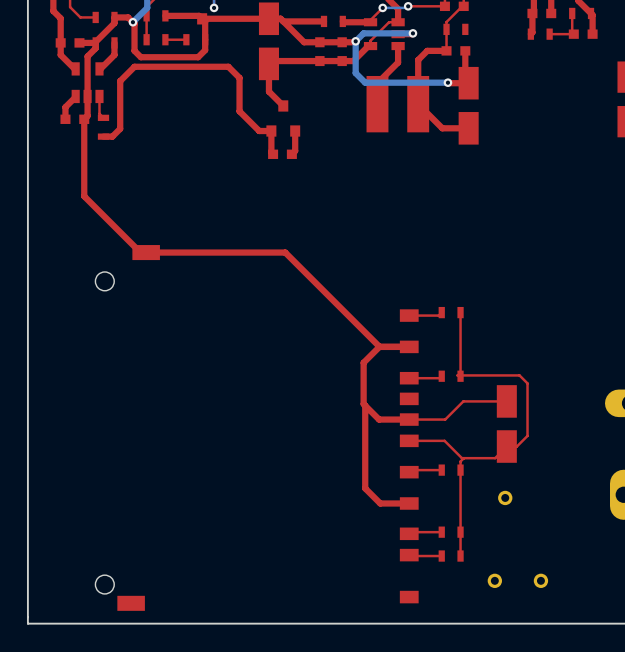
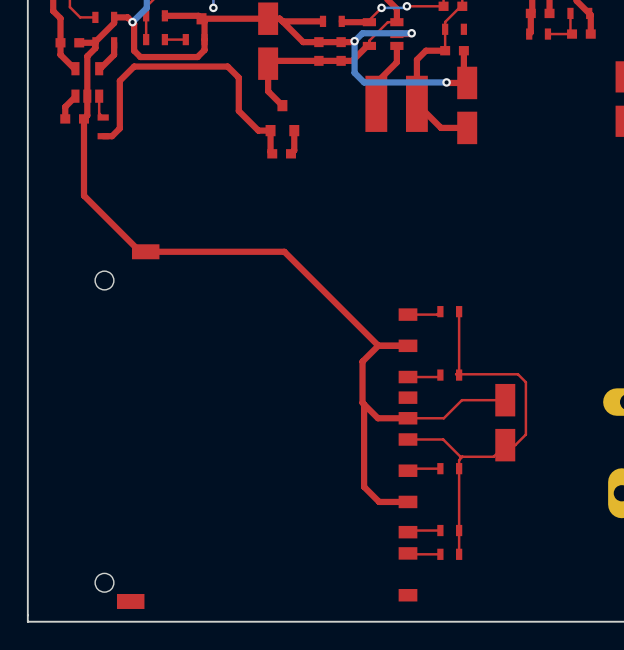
part: (505, 497) -> none
part: (494, 580) -> none
part: (540, 580) -> none

